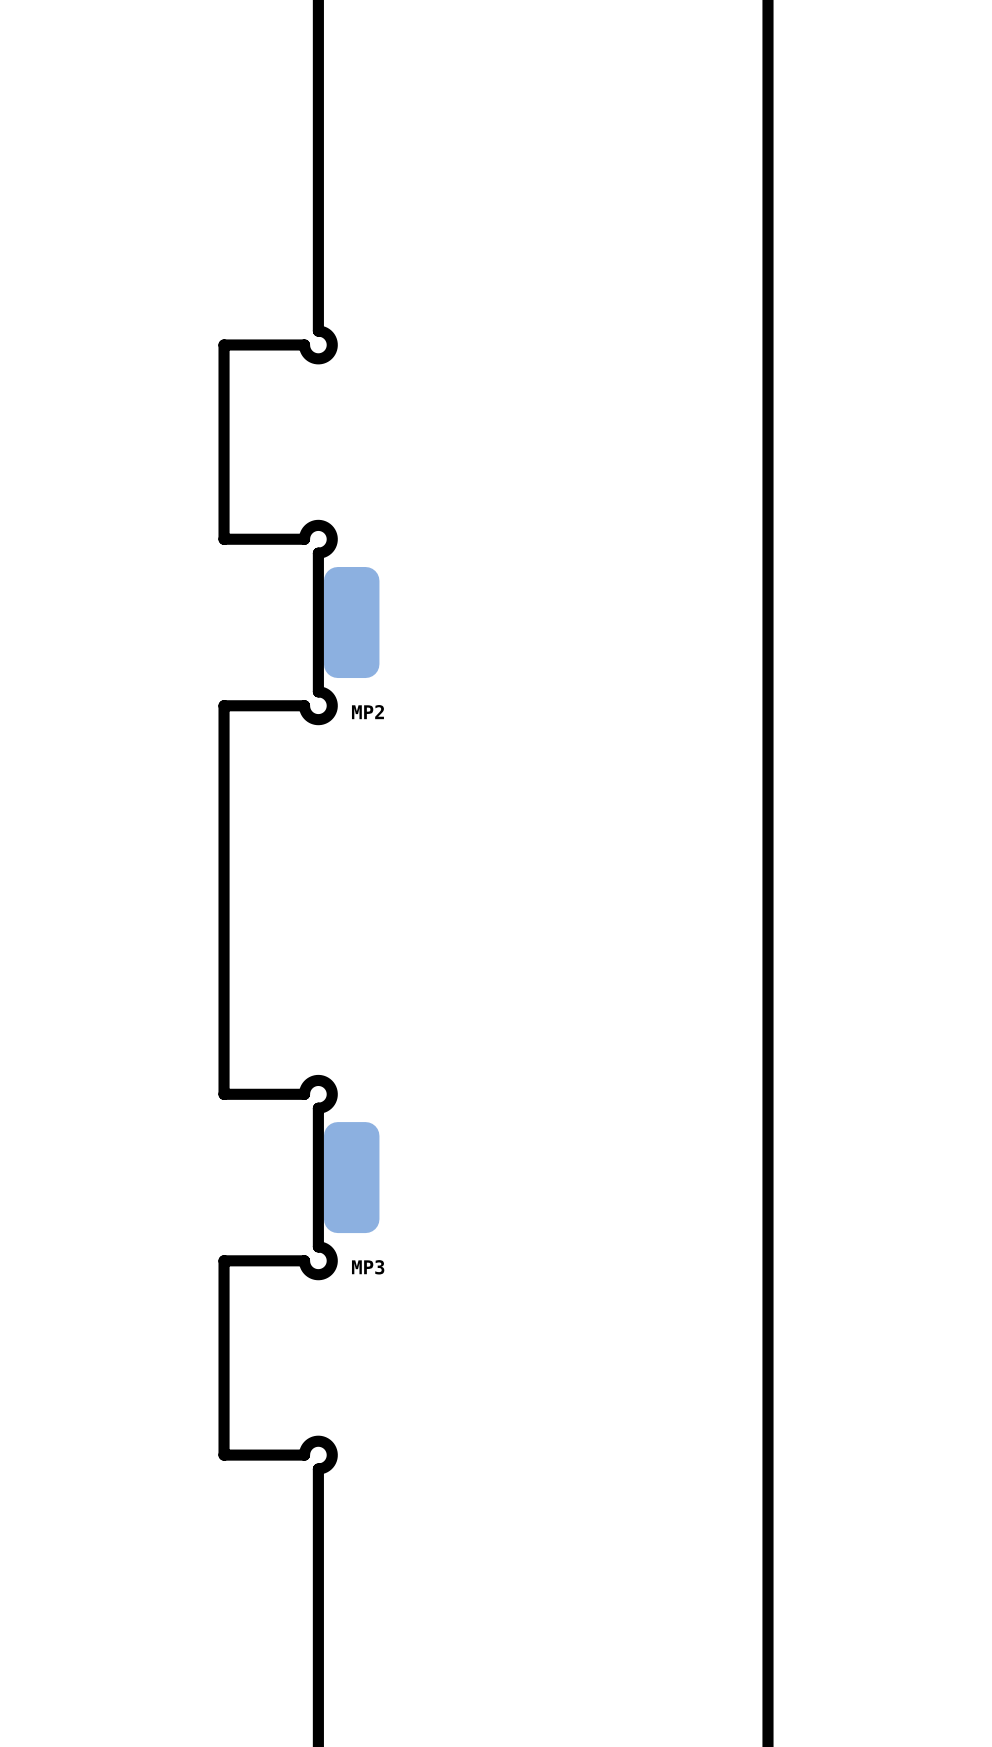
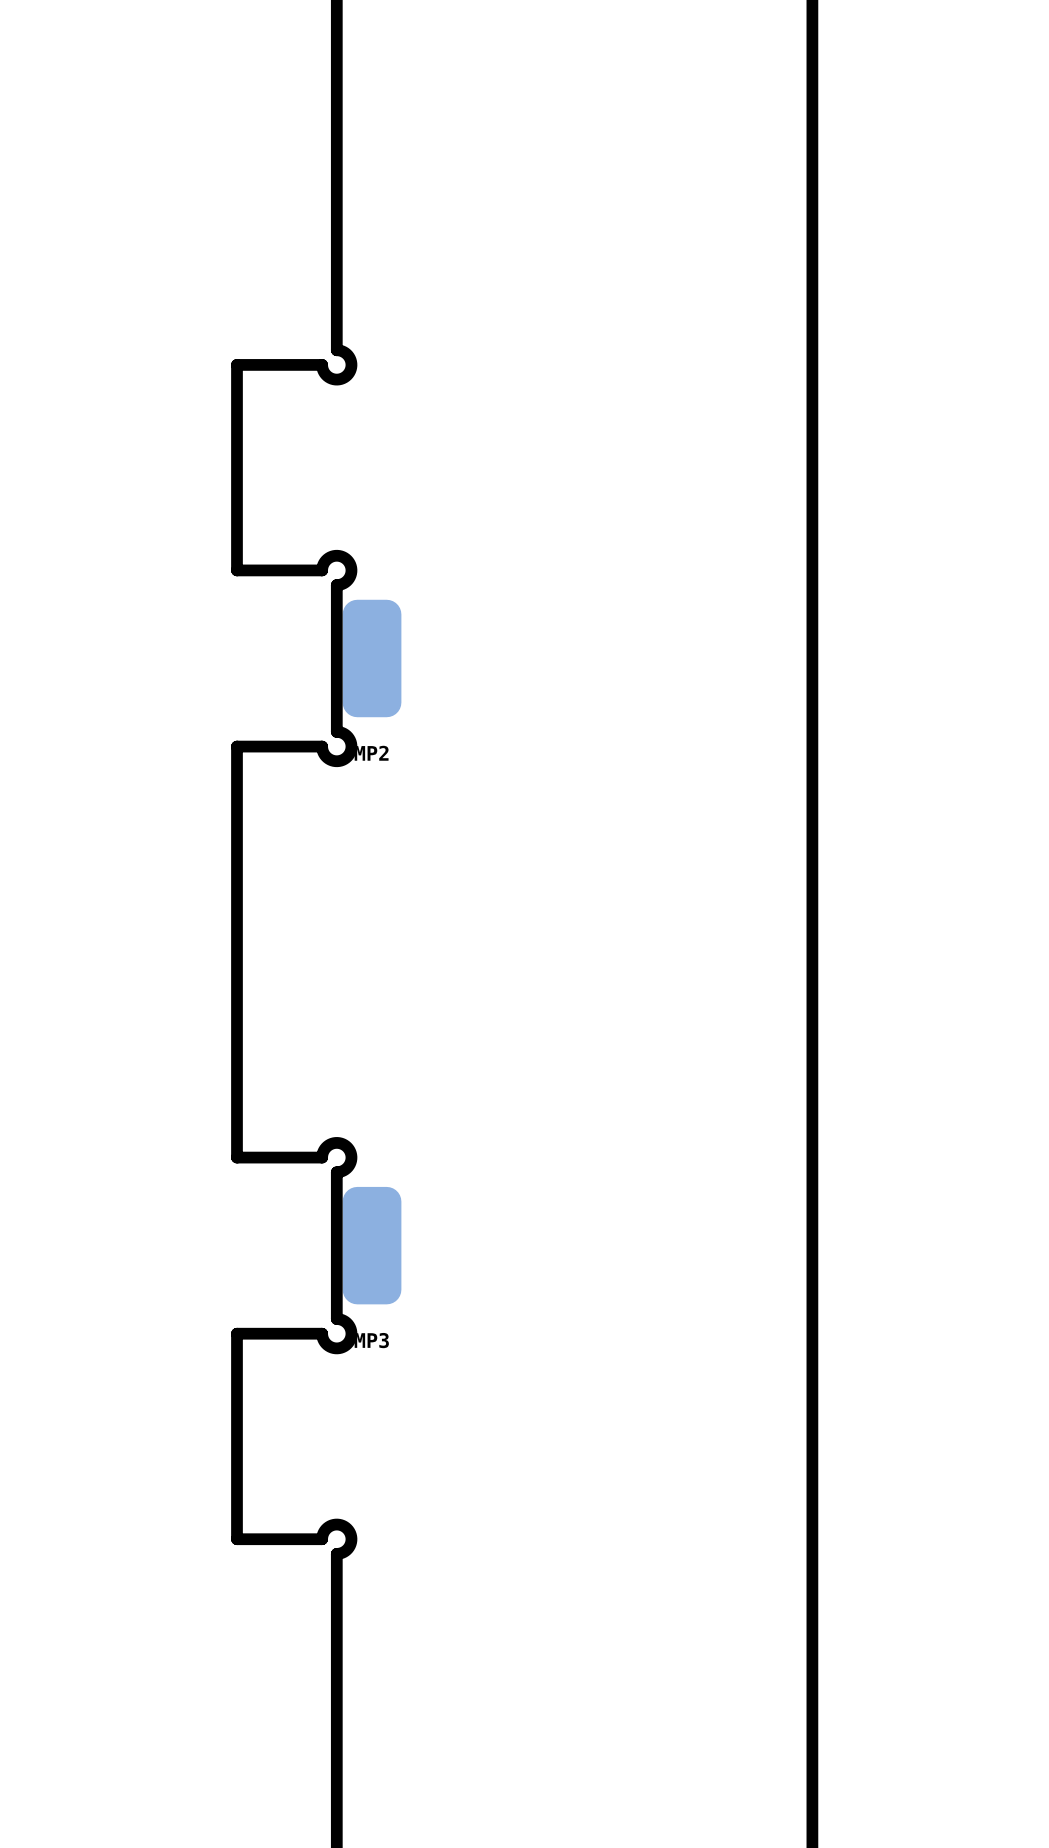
MP2 name position: MP2 (367, 712) -> MP2 (371, 753)
MP3 name position: MP3 (368, 1267) -> MP3 (371, 1340)

